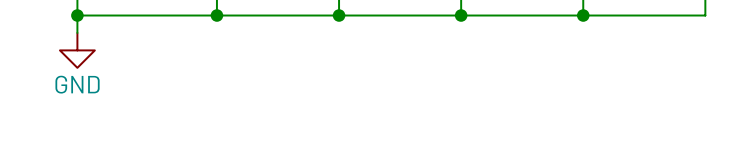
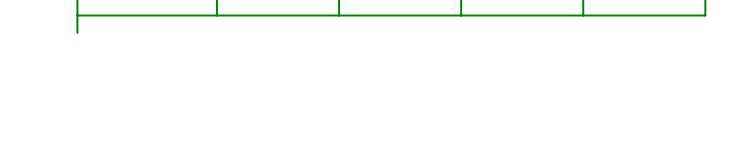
junction: (77, 15) -> none
junction: (216, 15) -> none
junction: (339, 15) -> none
junction: (461, 15) -> none
junction: (583, 15) -> none
power symbol: GND (77, 50) -> none

